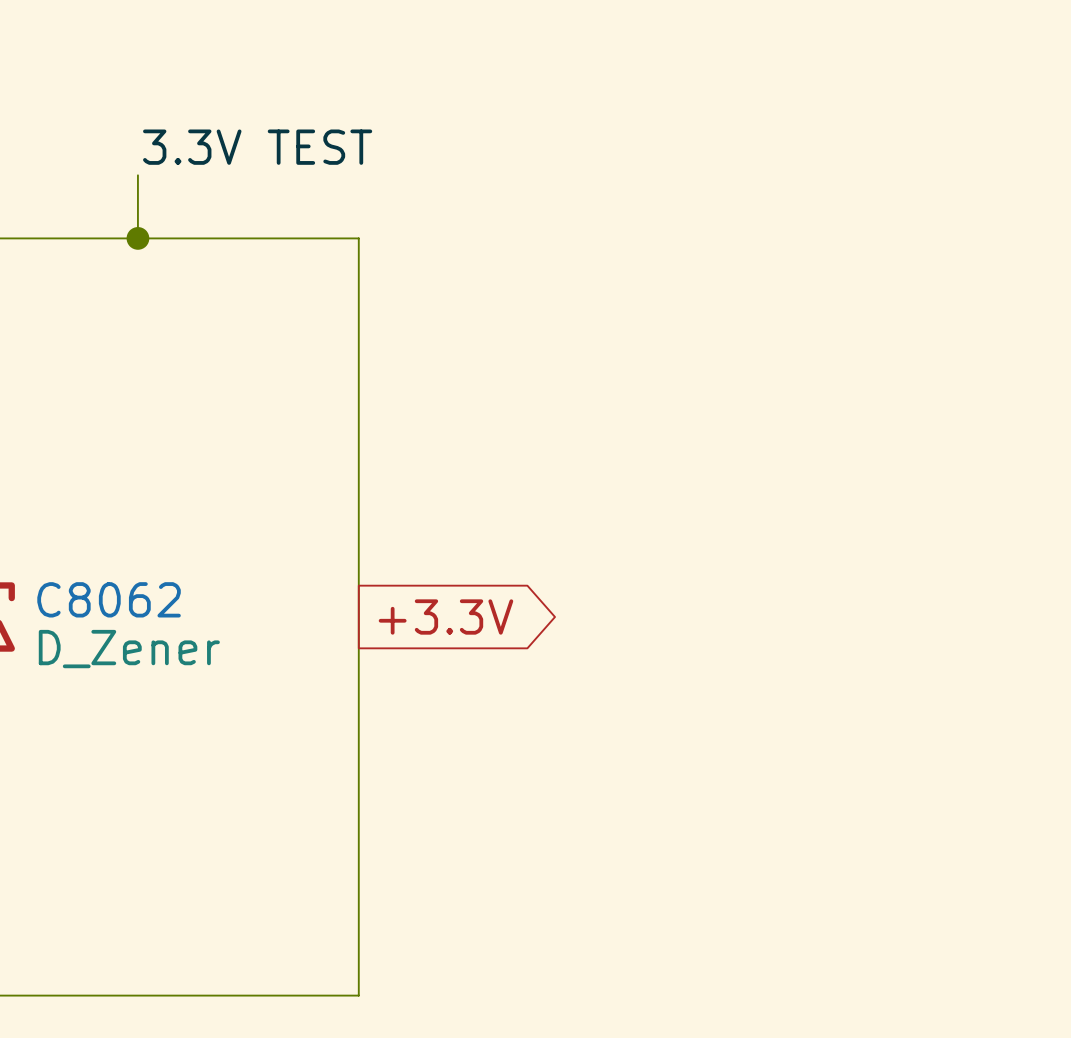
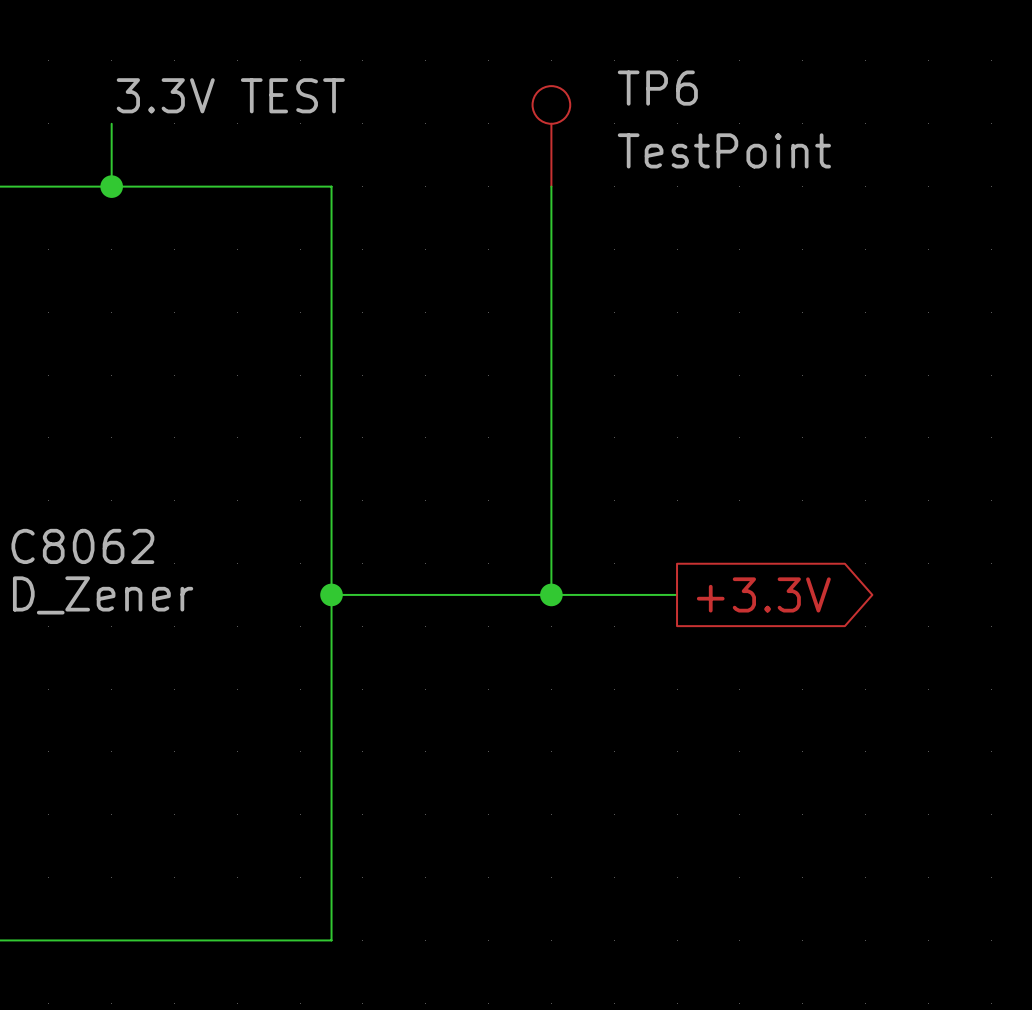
TP6: none -> TestPoint (551, 136)
wire: none -> (551, 186) (551, 594)
global label position: +3.3V (445, 617) -> +3.3V (763, 594)
wire: none -> (331, 594) (677, 594)
junction: none -> (331, 594)
junction: none -> (551, 594)

